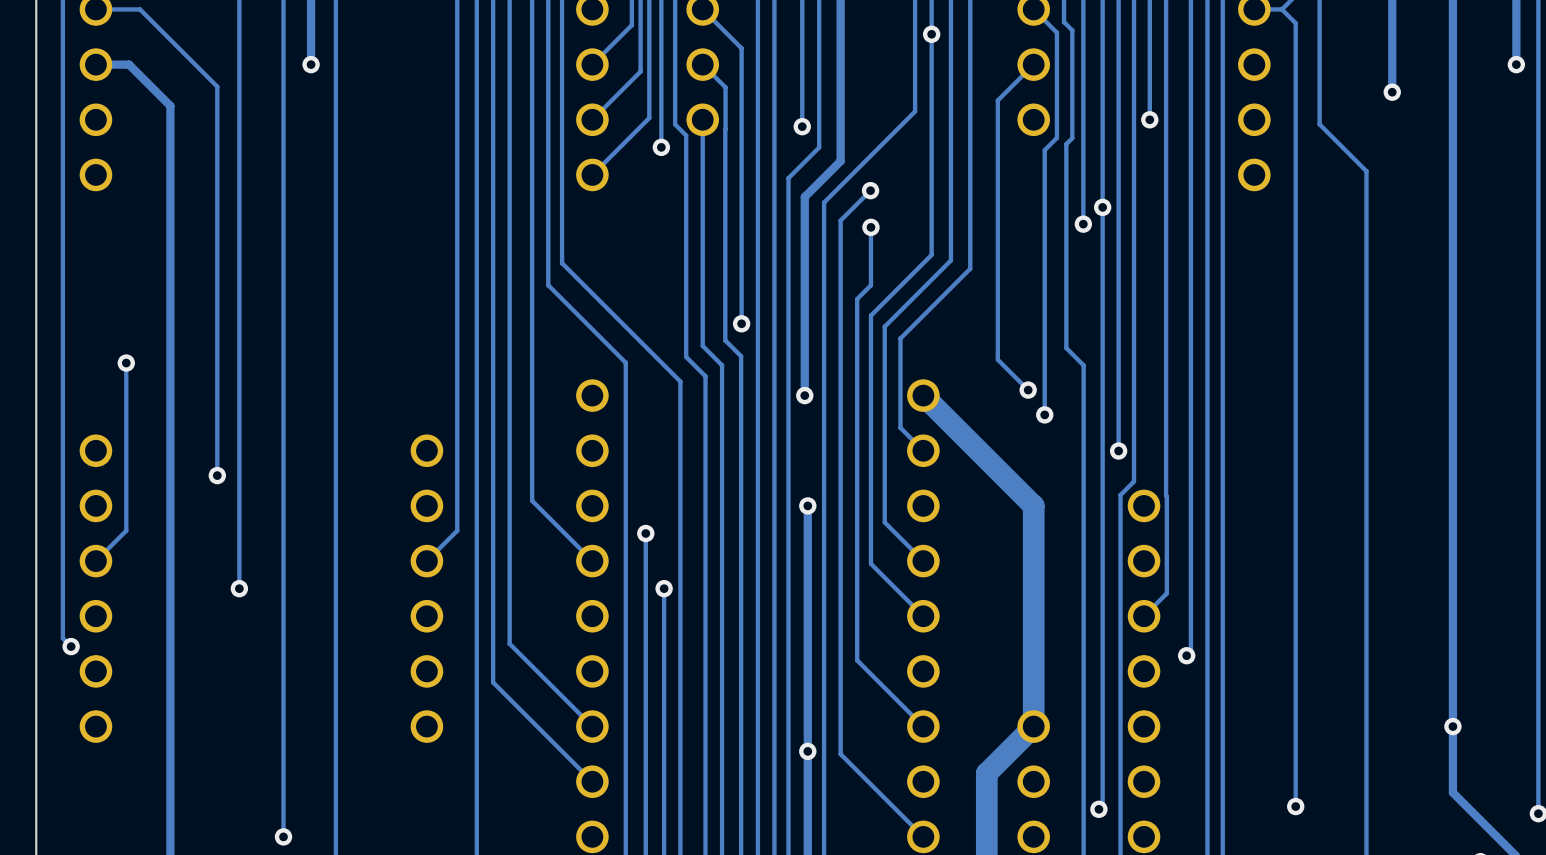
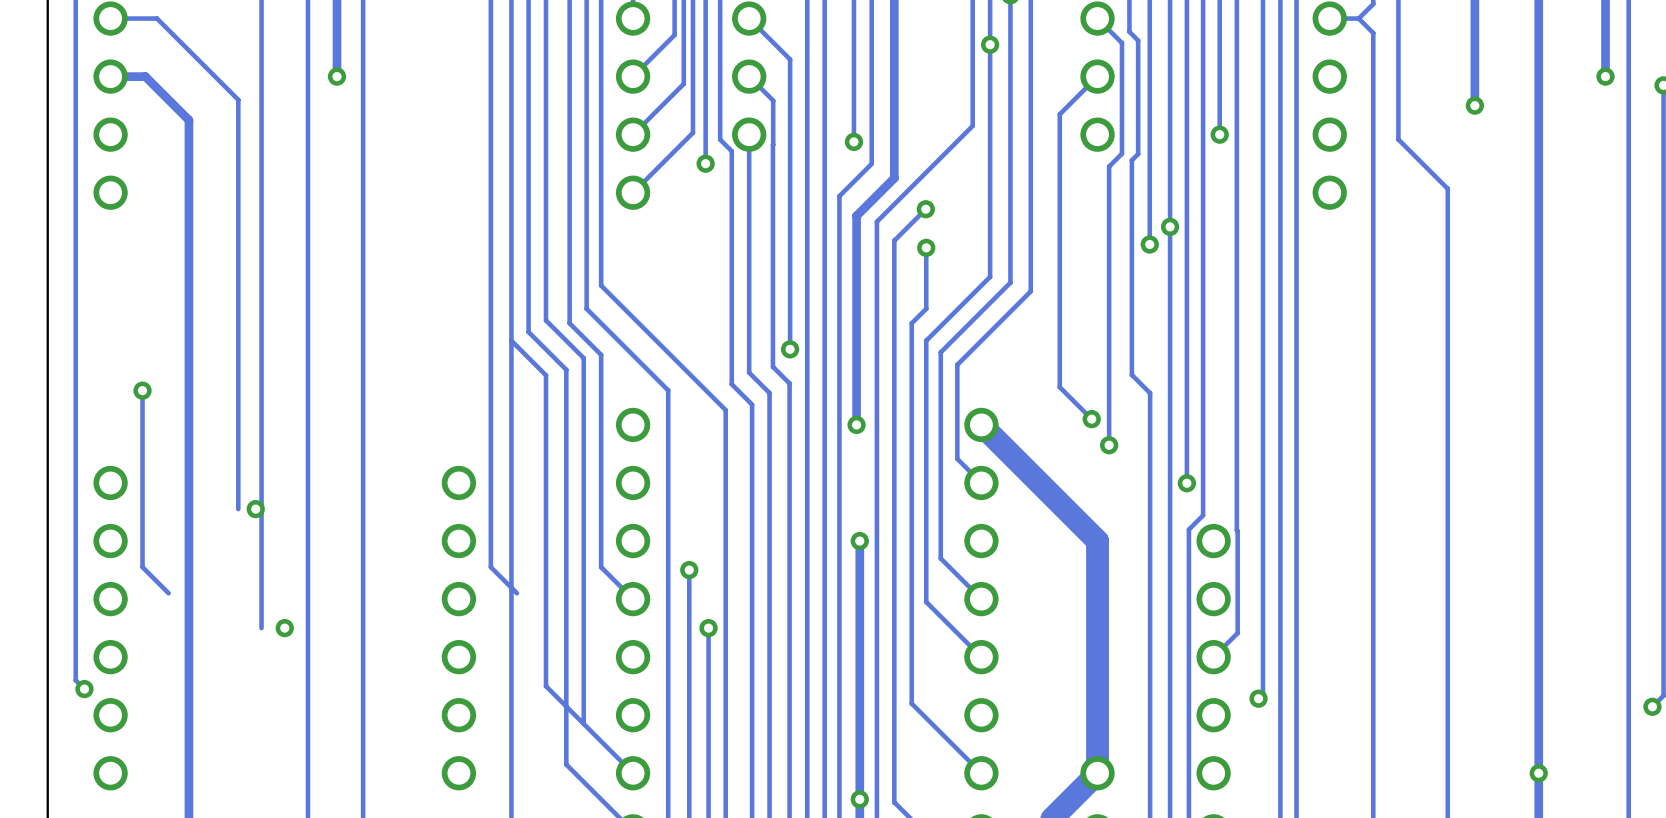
track: (509, 296) (509, 348) -> (511, 340) (546, 375)
track: none -> (546, 320) (583, 358) (583, 723)
track: (532, 299) (532, 500) (562, 530) -> (569, 323) (601, 354) (601, 567)
track: (493, 307) (493, 682) (528, 718) -> (528, 332) (566, 369) (566, 764)
via position: (217, 475) -> (255, 509)
track: (126, 530) (95, 561) -> (142, 567) (168, 593)
track: (457, 530) (426, 561) -> (490, 567) (516, 593)
via position: (239, 588) -> (284, 628)

